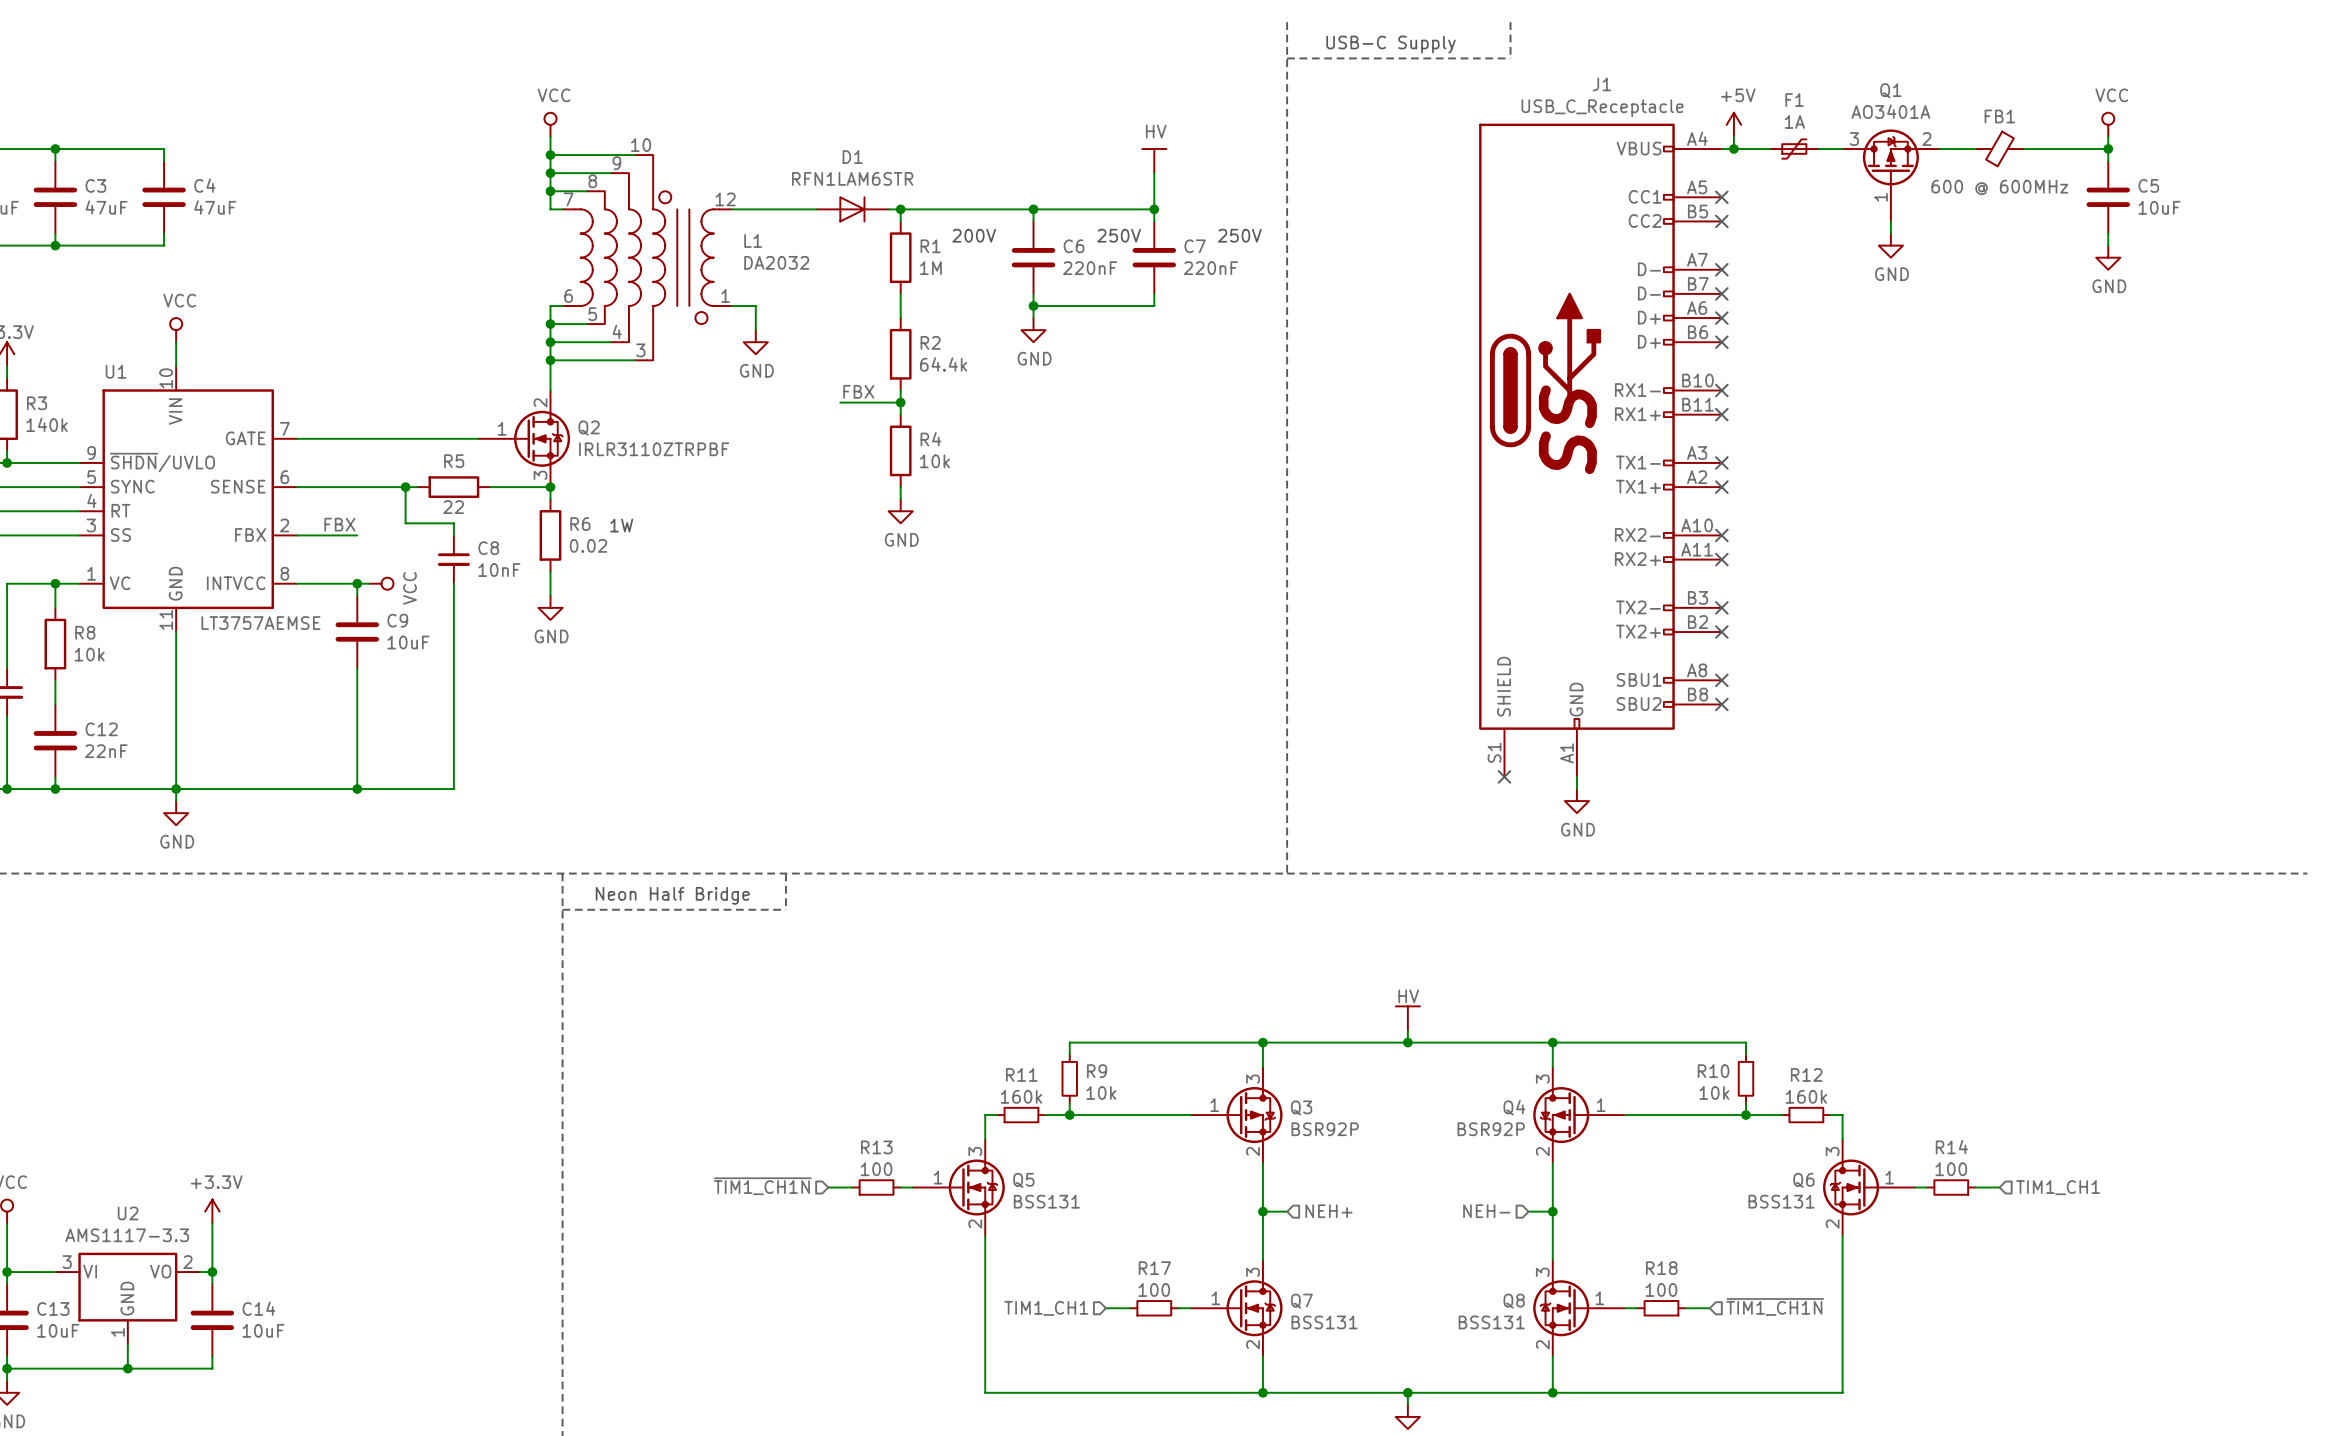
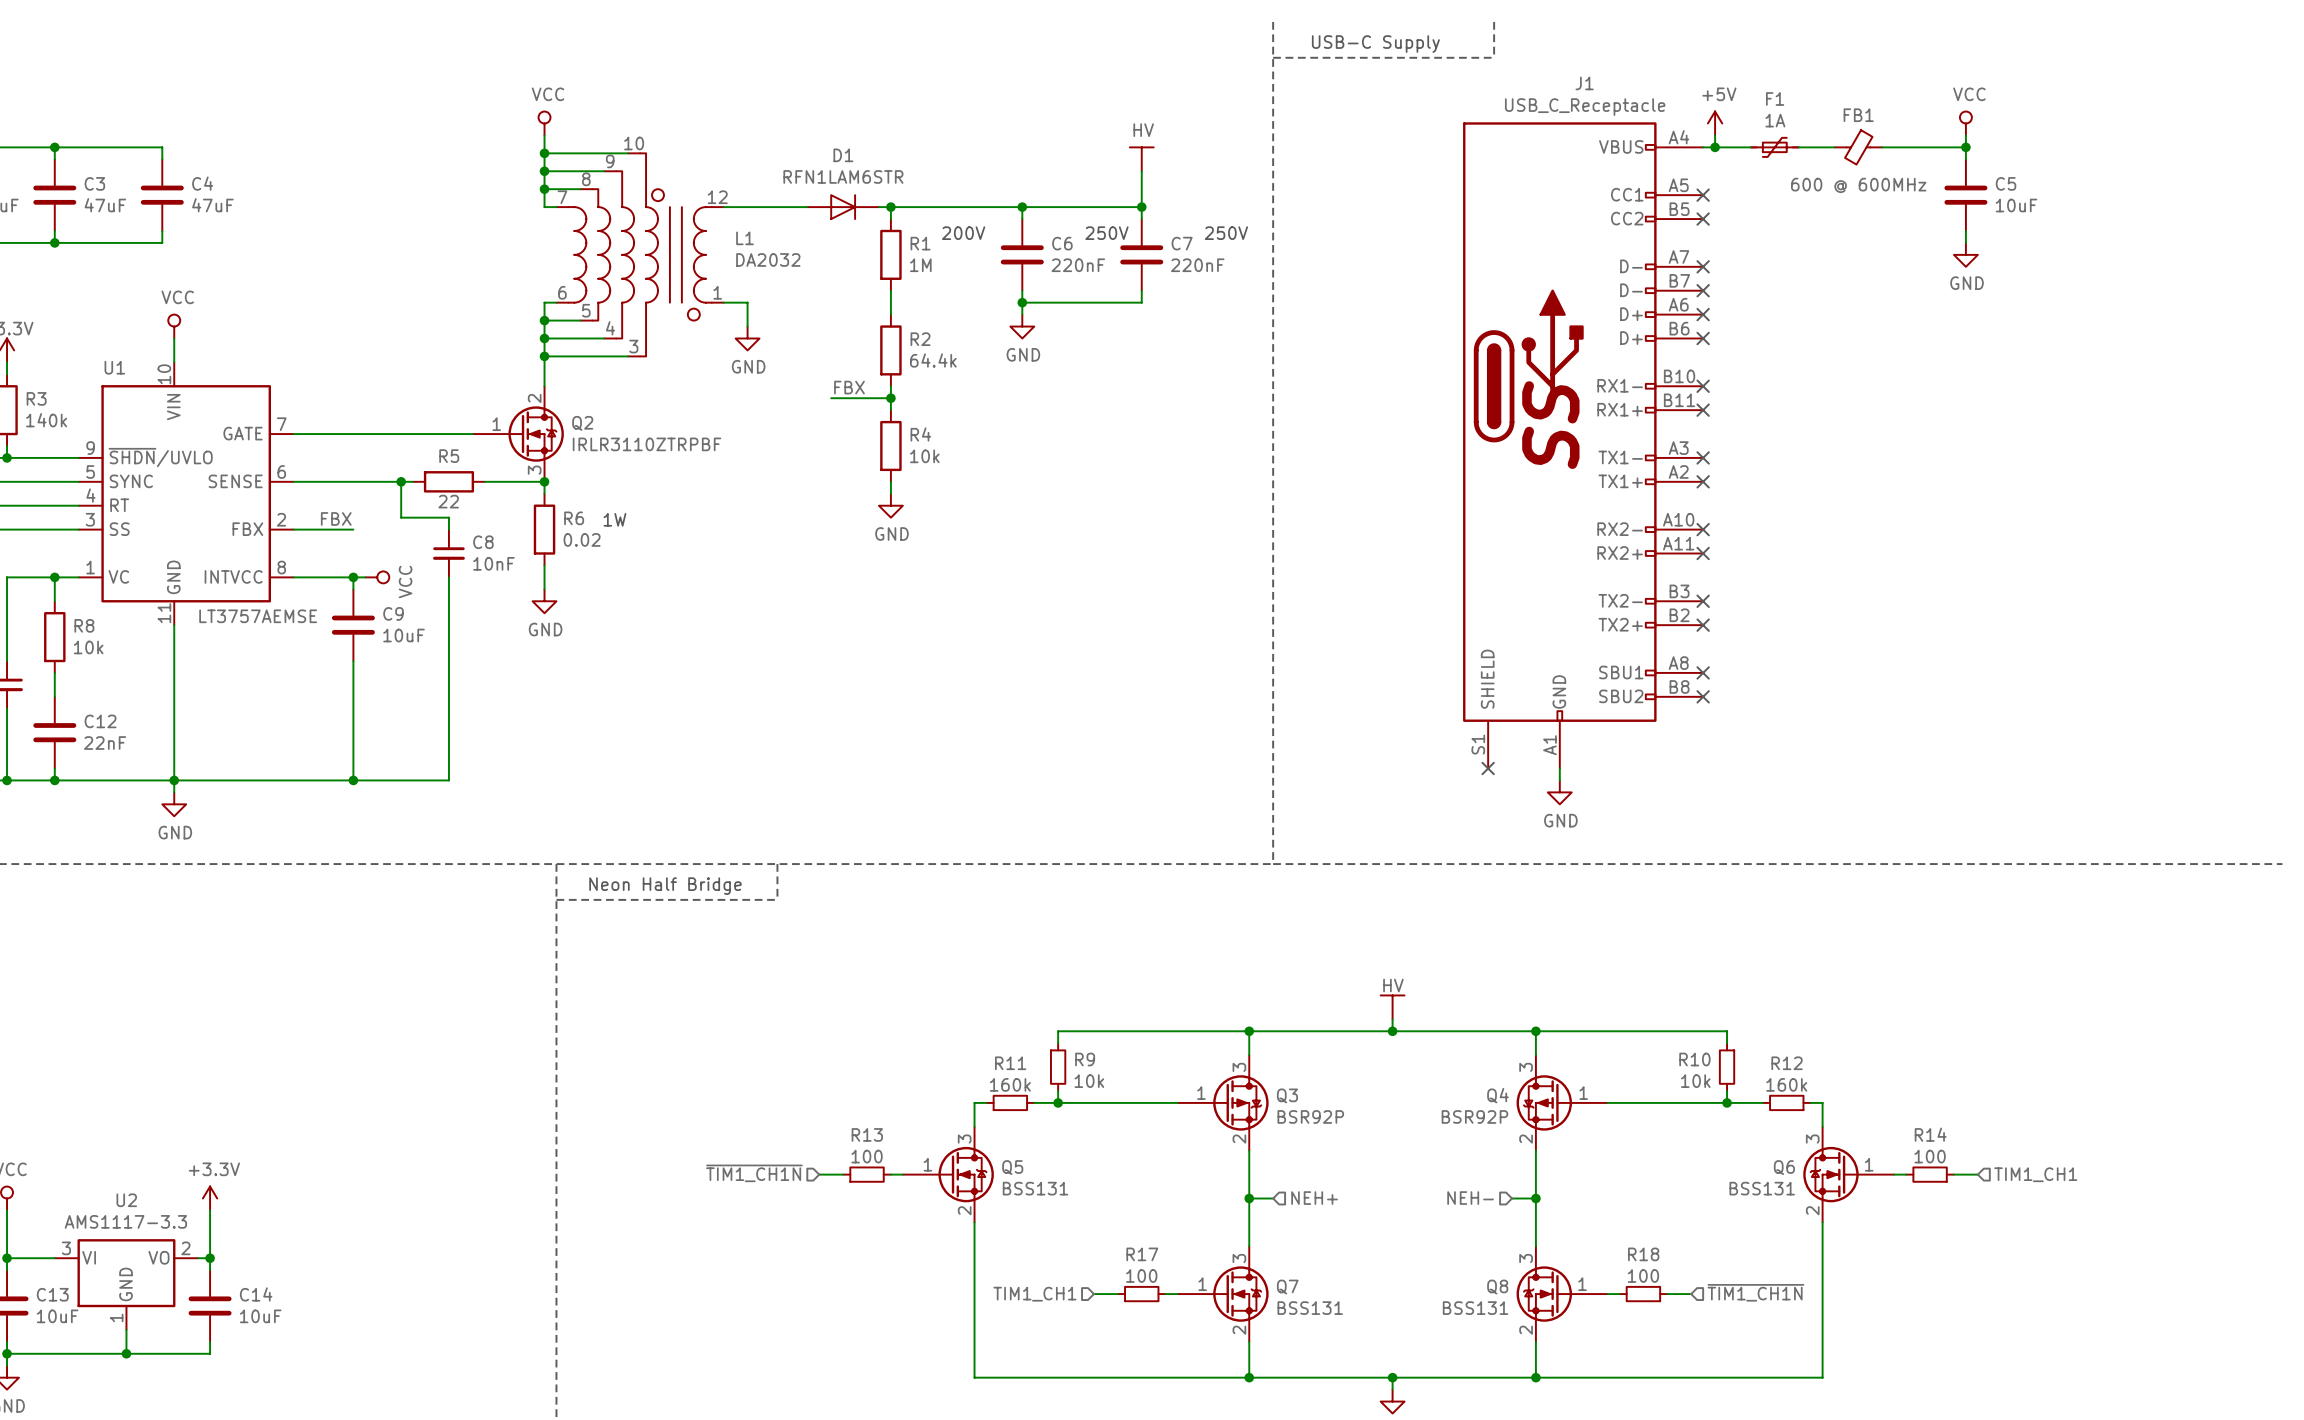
power symbol position: VCC (2108, 124) -> VCC (1965, 123)
wire: (2108, 136) (2108, 161) -> (1965, 135) (1965, 159)
junction: none -> (1965, 147)
FB1 position: (1999, 148) -> (1858, 147)
wire: (2023, 148) (2108, 148) -> none
junction: (2108, 148) -> none
Q1: AO3401A (1890, 175) -> none
C5 position: (2108, 197) -> (1965, 195)
wire: (1890, 221) (1890, 233) -> none
wire: (2108, 233) (2108, 245) -> (1965, 230) (1965, 242)
power symbol: GND (1890, 245) -> none
power symbol: none -> GND (1965, 254)
power symbol: GND (2108, 257) -> none

